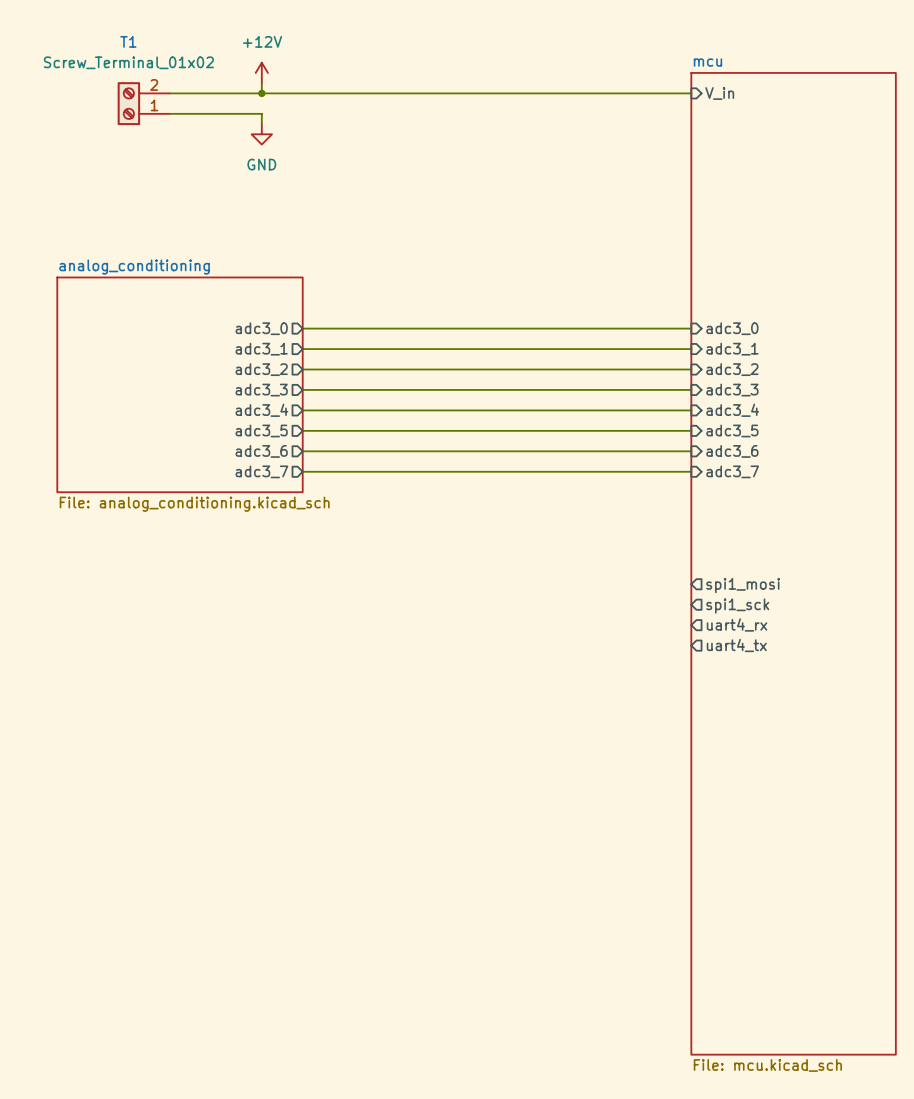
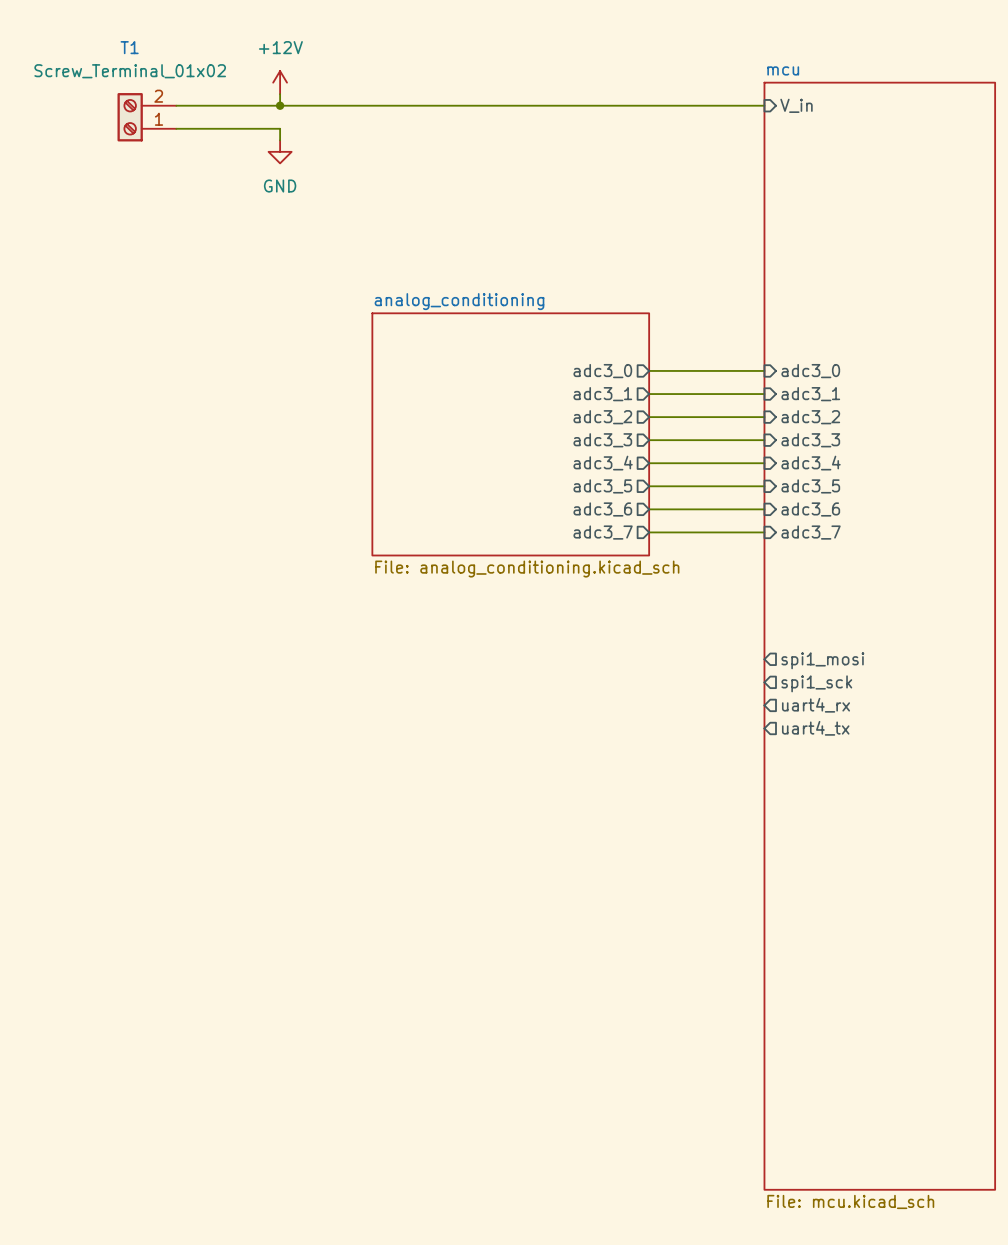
sheet pin: adc3_0 (261, 328) -> none
wire: (302, 328) (589, 328) -> none
sheet pin: none -> adc3_0 (602, 371)
sheet pin: adc3_1 (261, 349) -> none
wire: (302, 349) (589, 349) -> none
sheet pin: none -> adc3_1 (602, 394)
sheet pin: adc3_2 (261, 369) -> none
wire: (302, 369) (589, 369) -> none
sheet pin: none -> adc3_2 (602, 417)
sheet analog_conditioning: File: analog_conditioning.kicad_sch (180, 384) -> none
sheet analog_conditioning: none -> File: analog_conditioning.kicad_sch (510, 434)
wire: (302, 389) (589, 389) -> none
sheet pin: adc3_3 (261, 390) -> none
sheet pin: none -> adc3_3 (602, 440)
sheet pin: adc3_4 (261, 410) -> none
wire: (302, 410) (589, 410) -> none
sheet pin: none -> adc3_4 (603, 463)
sheet pin: adc3_5 (261, 430) -> none
wire: (302, 430) (589, 430) -> none
sheet pin: none -> adc3_5 (602, 486)
sheet pin: adc3_6 (261, 451) -> none
wire: (302, 451) (589, 451) -> none
sheet pin: none -> adc3_6 (602, 509)
sheet pin: adc3_7 (261, 471) -> none
wire: (302, 471) (589, 471) -> none
sheet pin: none -> adc3_7 (603, 532)

